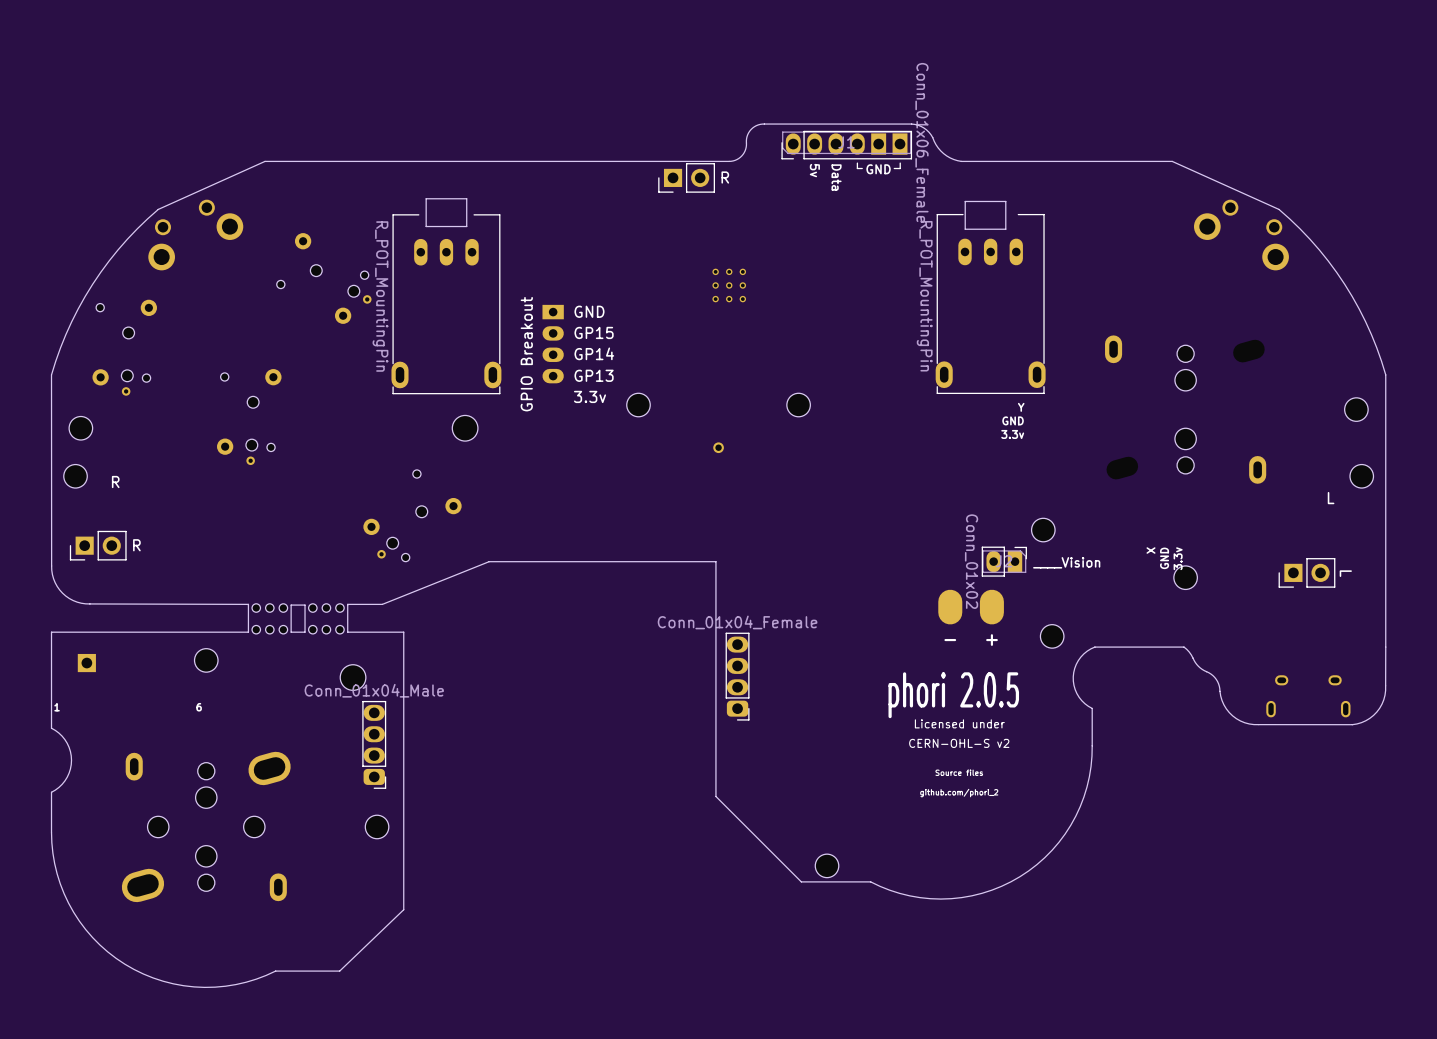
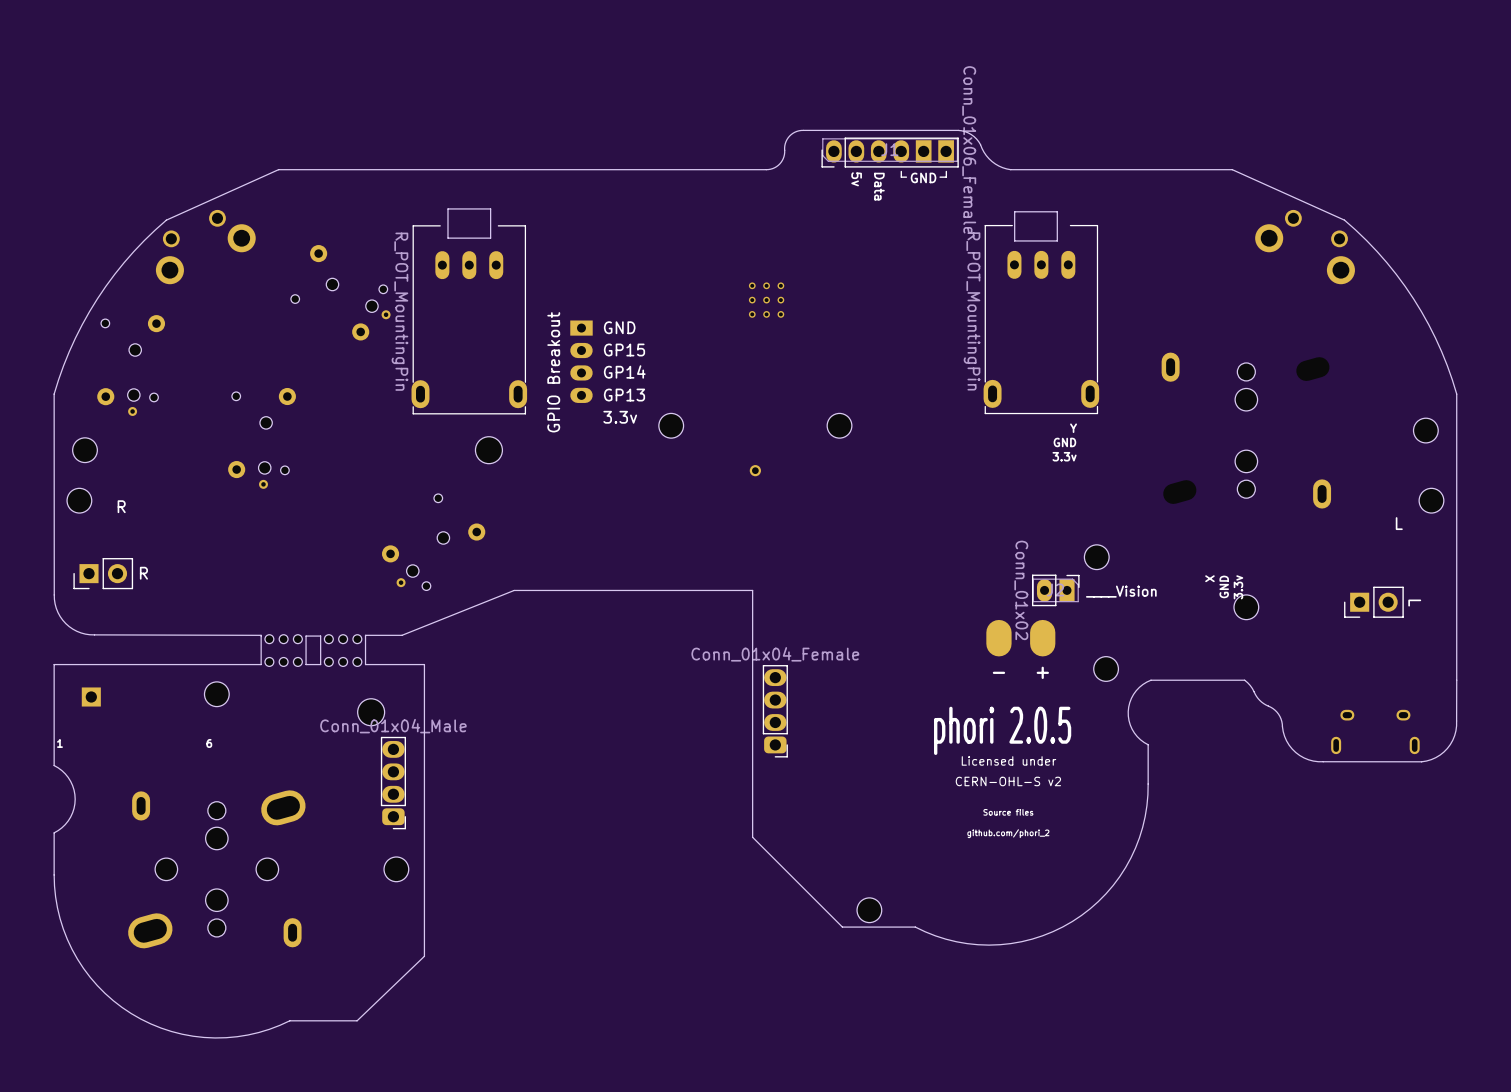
part: R (686, 177) -> none

